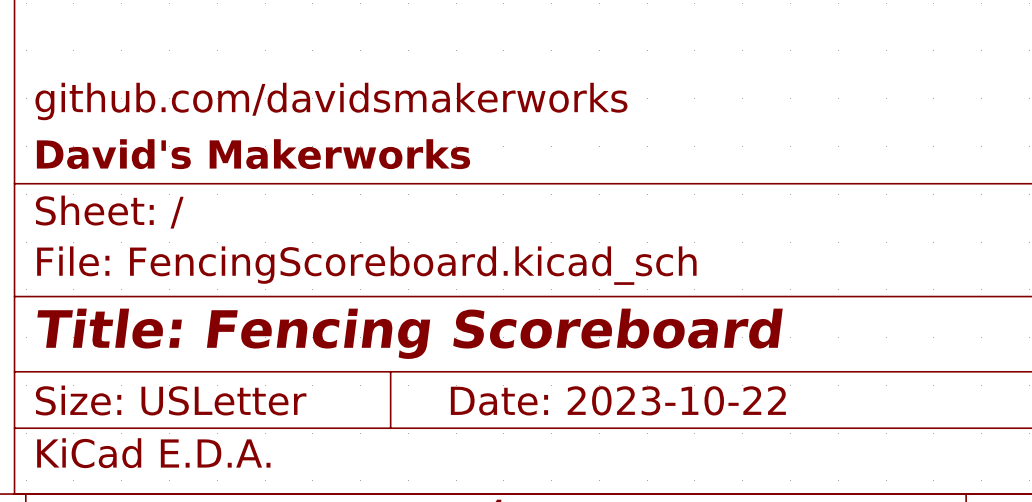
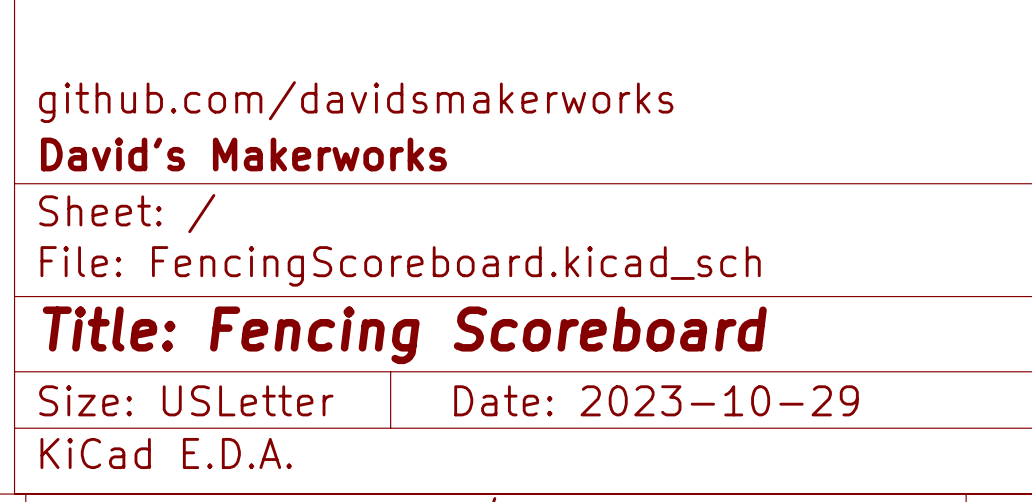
title block: Date: 2023-10-22 (618, 400) -> Date: 2023-10-29 (656, 400)

